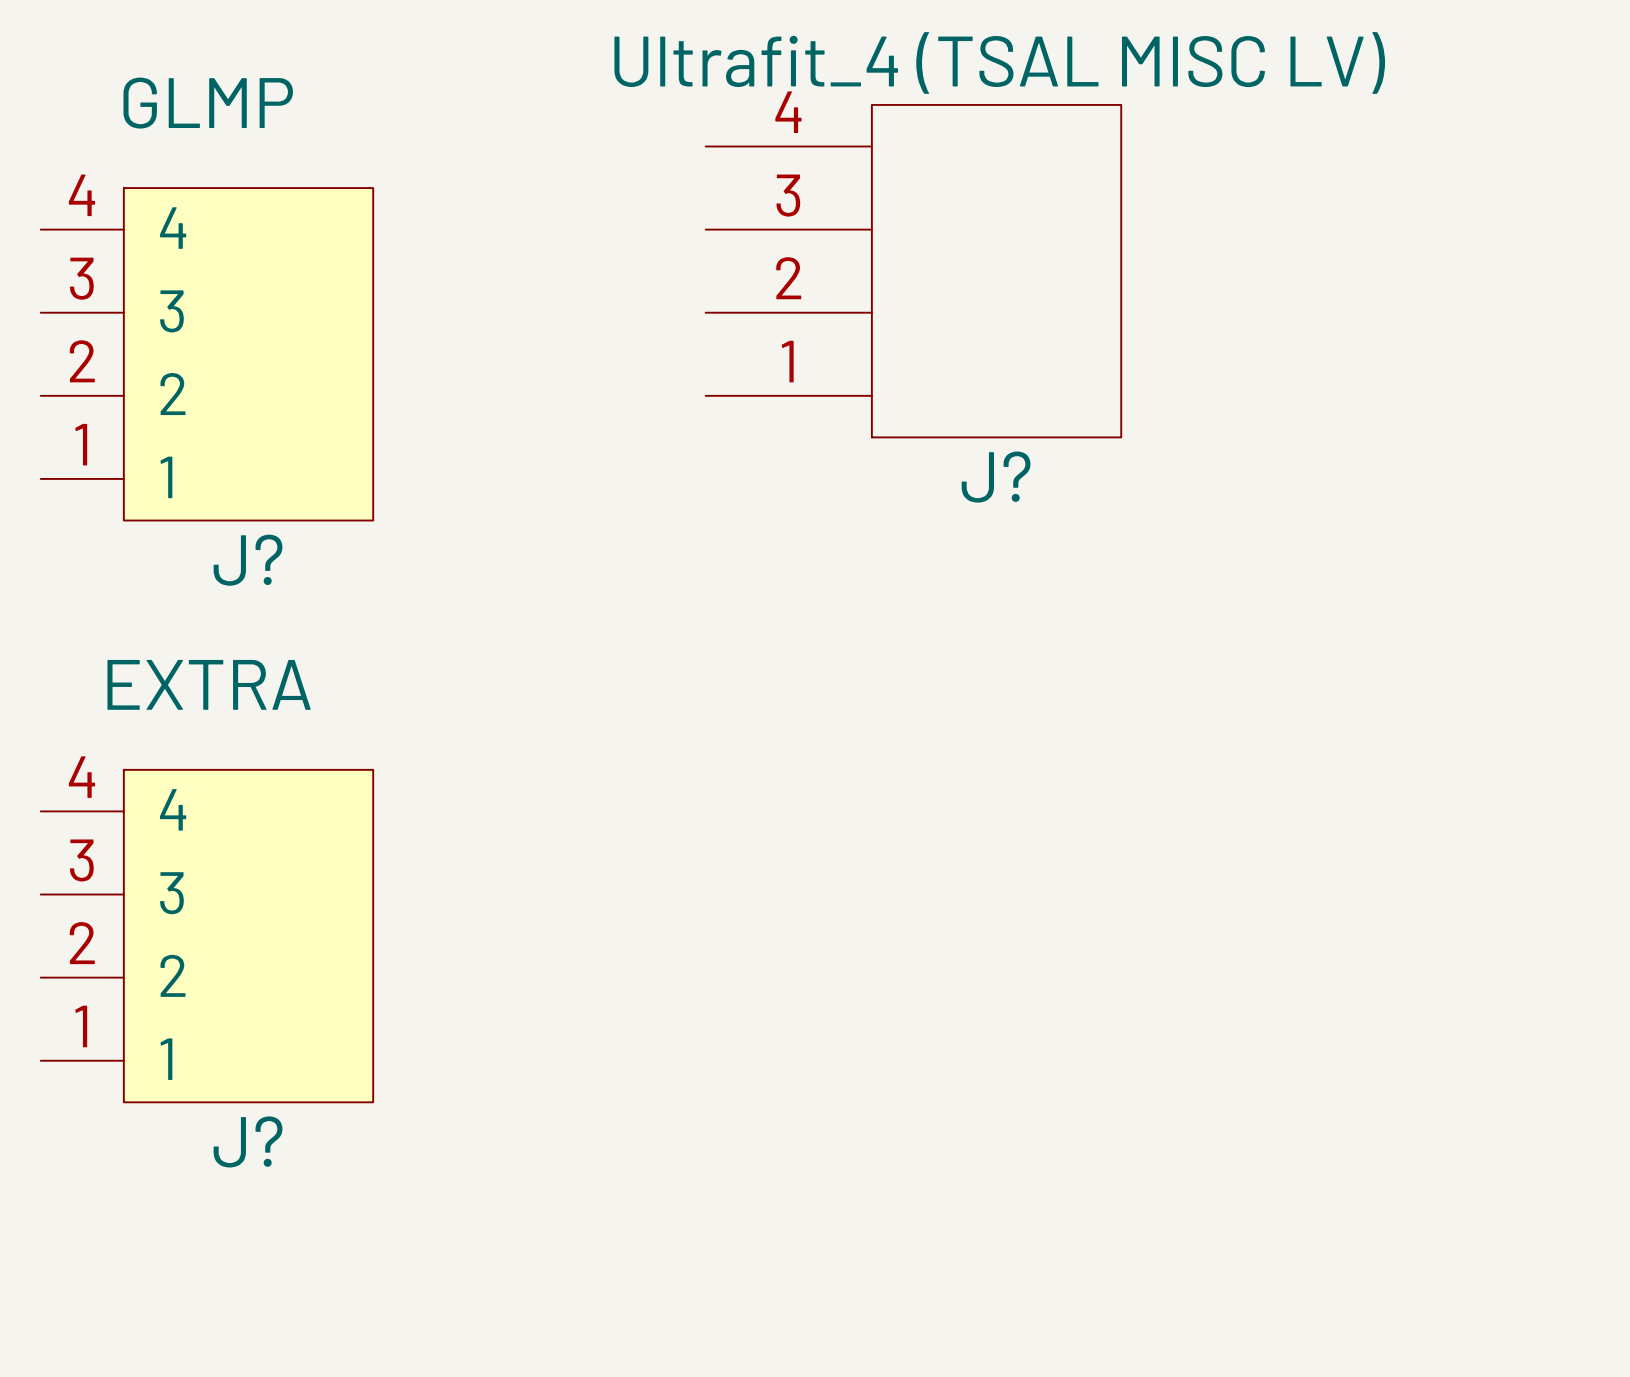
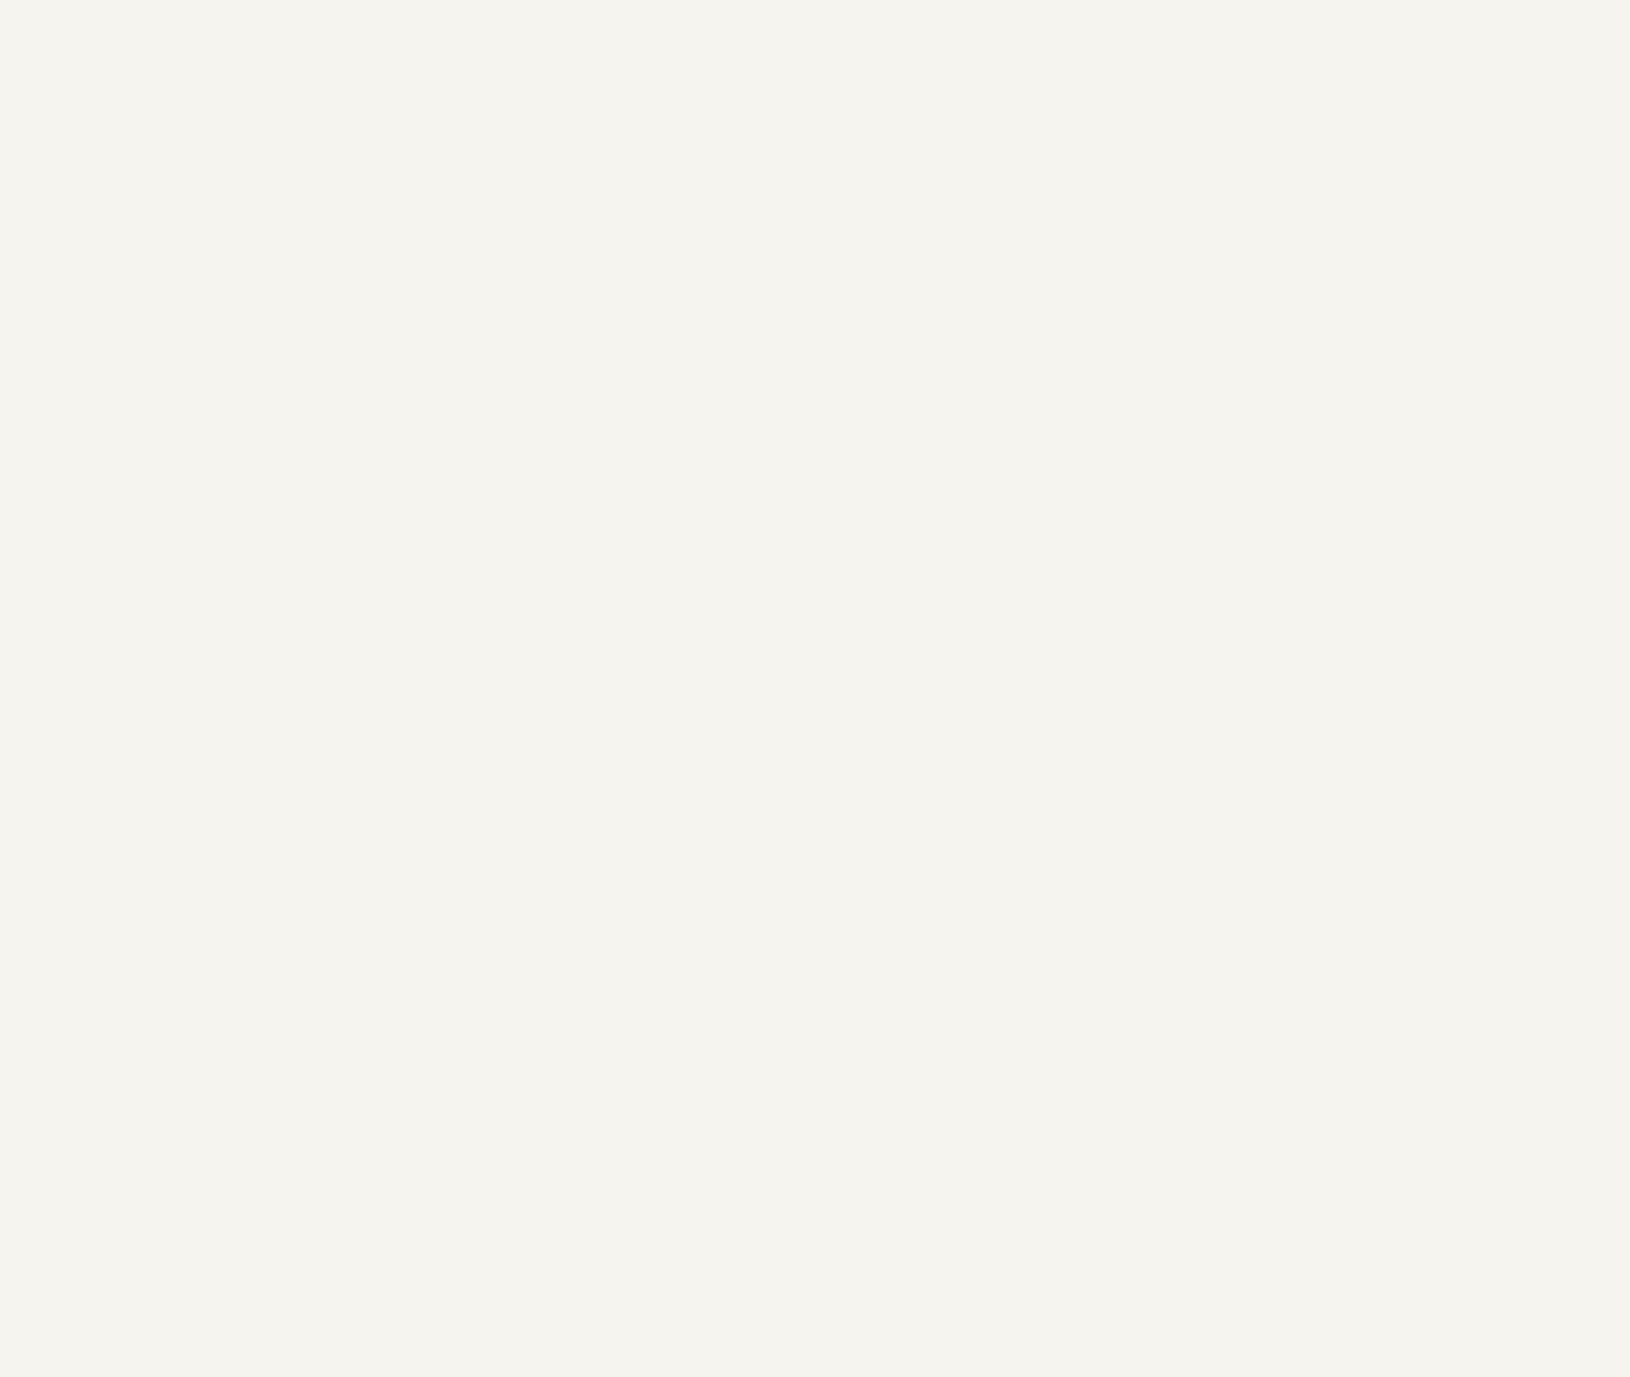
J?: Ultrafit_4 (TSAL MISC LV) (913, 271) -> none
J?: GLMP (206, 354) -> none
J?: EXTRA (206, 936) -> none

